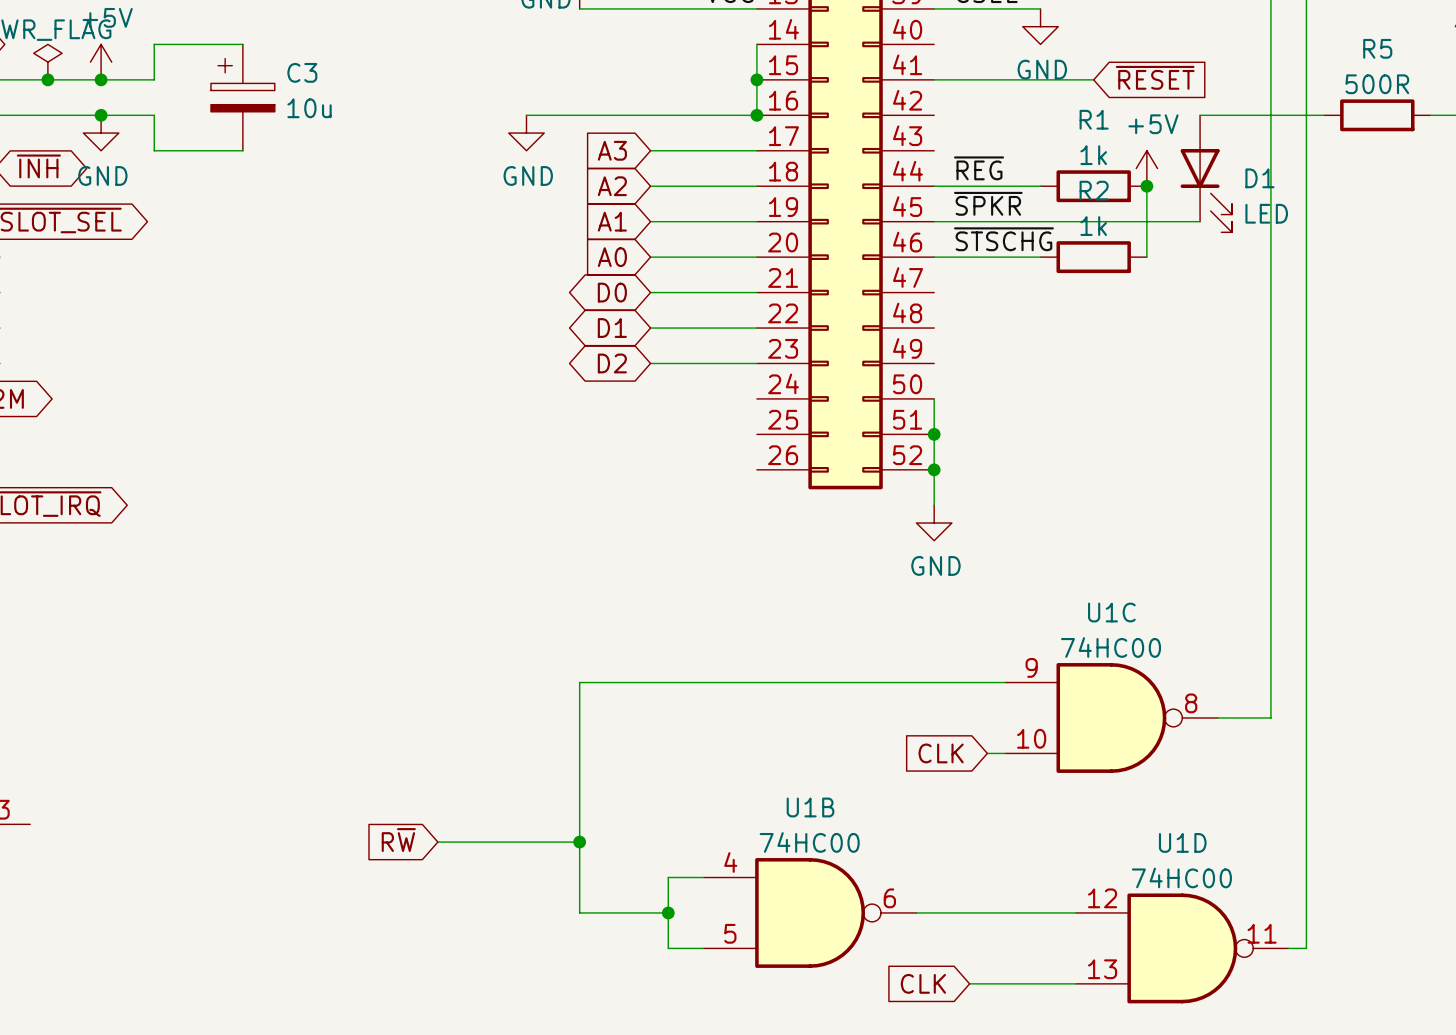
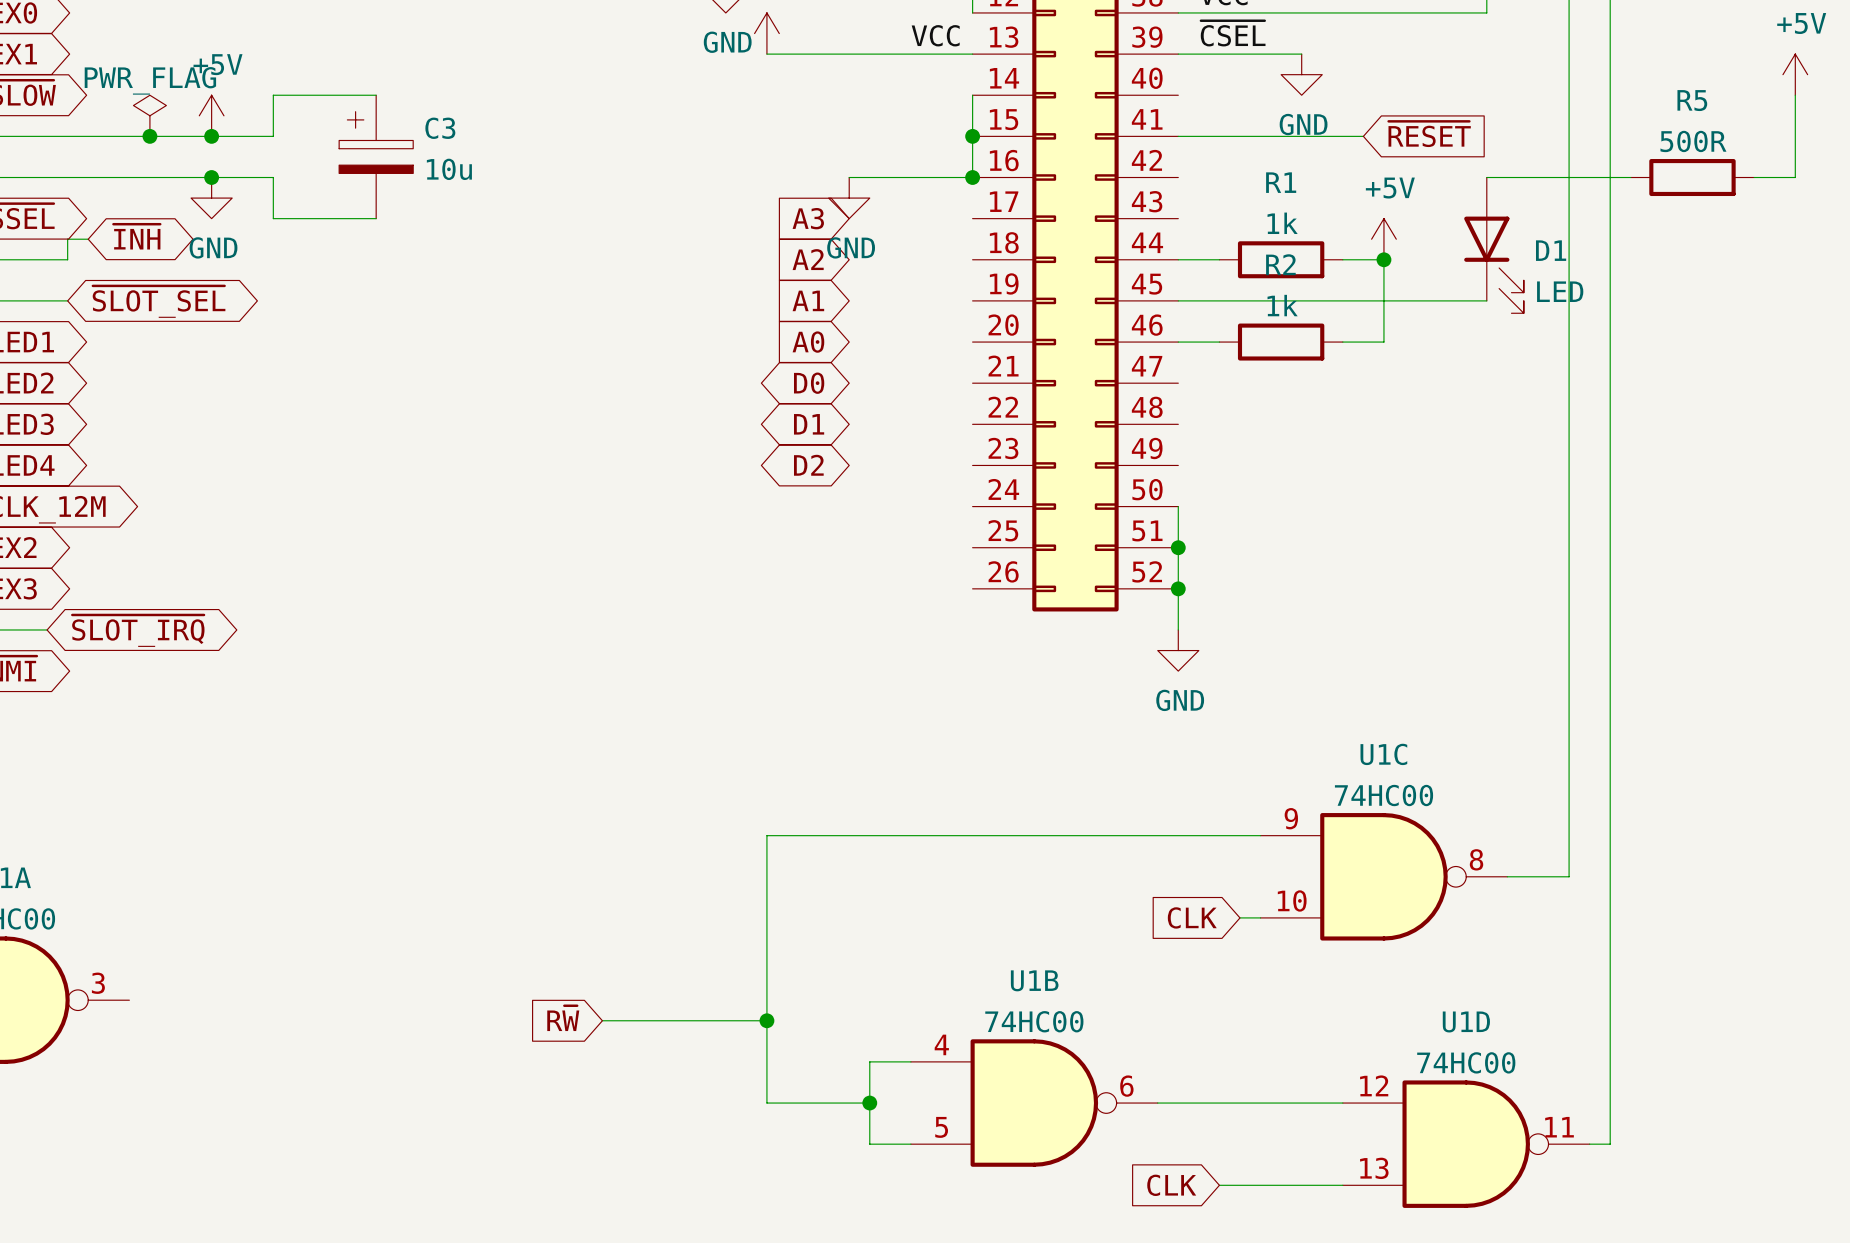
wire: (526, 115) (650, 115) -> none
power symbol position: GND (526, 133) -> GND (849, 198)
wire: (650, 150) (756, 150) -> none
label: ~{REG} (979, 168) -> none
power symbol position: +5V (1146, 168) -> +5V (1383, 239)
wire: (650, 186) (756, 186) -> none
wire: (969, 186) (1040, 186) -> none
wire: none -> (1342, 259) (1383, 259) (1383, 342) (1342, 342)
R1 position: (1093, 186) -> (1281, 259)
wire: (1146, 186) (1146, 257) -> none
junction position: (1146, 186) -> (1383, 259)
label: ~{SPKR} (988, 203) -> none
wire: (650, 221) (756, 221) -> none
label: ~{STSCHG} (1003, 239) -> none
wire: (650, 257) (756, 257) -> none
wire: (969, 257) (1040, 257) -> none
R2 position: (1093, 257) -> (1281, 342)
wire: (650, 292) (756, 292) -> none
wire: (650, 328) (756, 328) -> none
wire: (650, 363) (756, 363) -> none

